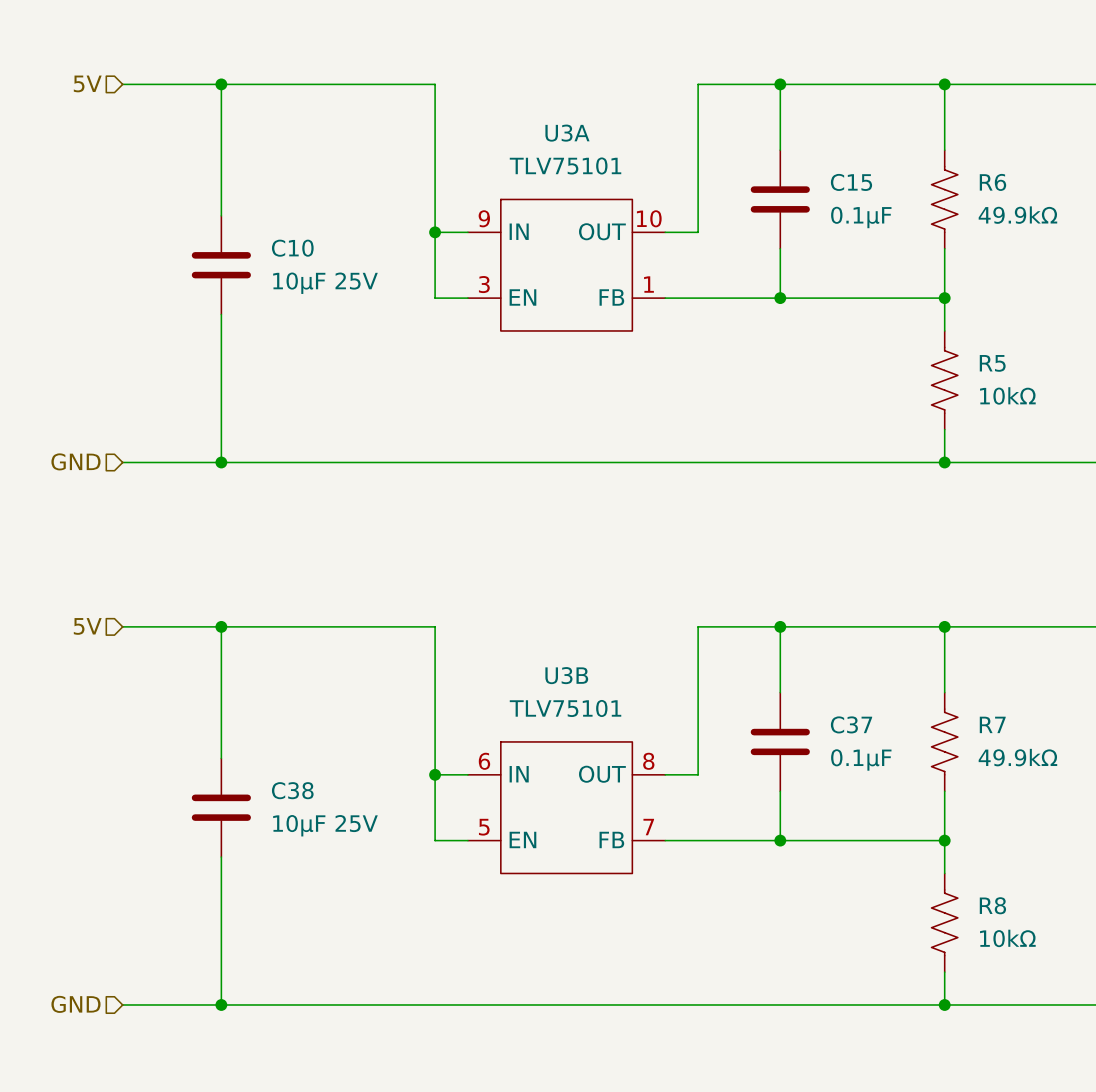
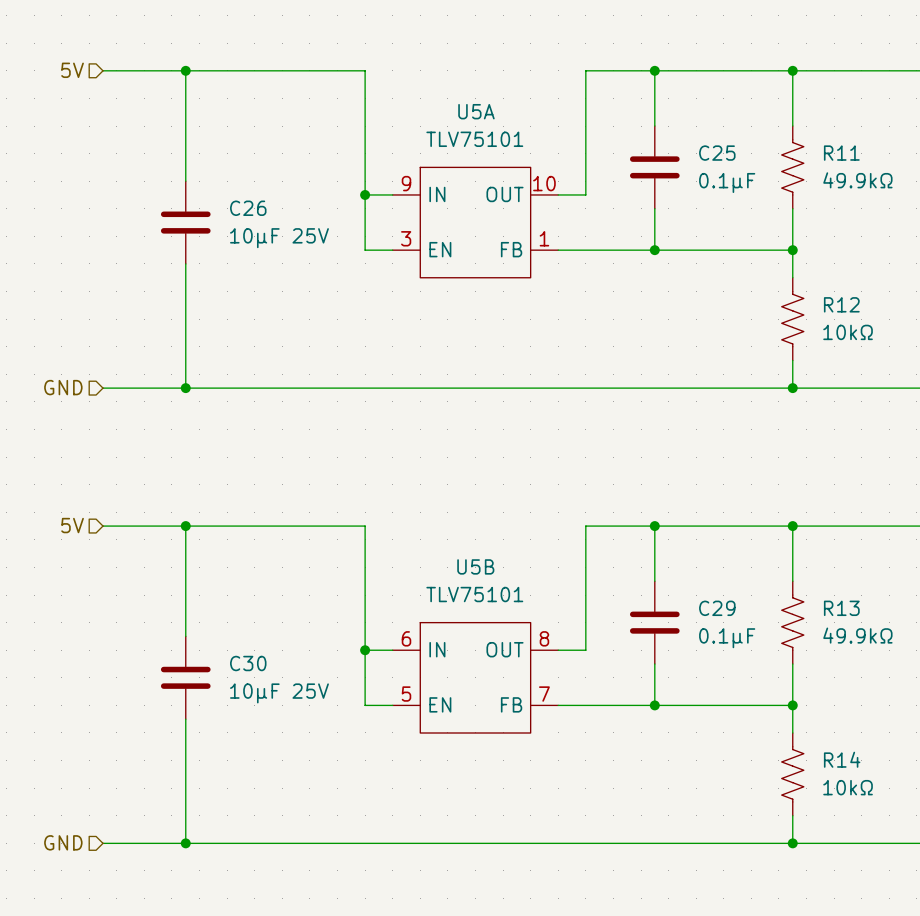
U3A name: U3A (567, 133) -> U5A (476, 111)
C15 name: C15 (851, 182) -> C25 (717, 153)
R6 name: R6 (992, 182) -> R11 (841, 153)
C10 name: C10 (292, 248) -> C26 (248, 208)
R5 name: R5 (992, 363) -> R12 (841, 304)
U3B name: U3B (566, 675) -> U5B (475, 566)
C37 name: C37 (851, 724) -> C29 (717, 608)
R7 name: R7 (992, 724) -> R13 (841, 608)
C38 name: C38 (292, 790) -> C30 (248, 663)
R8 name: R8 (992, 905) -> R14 (842, 759)

